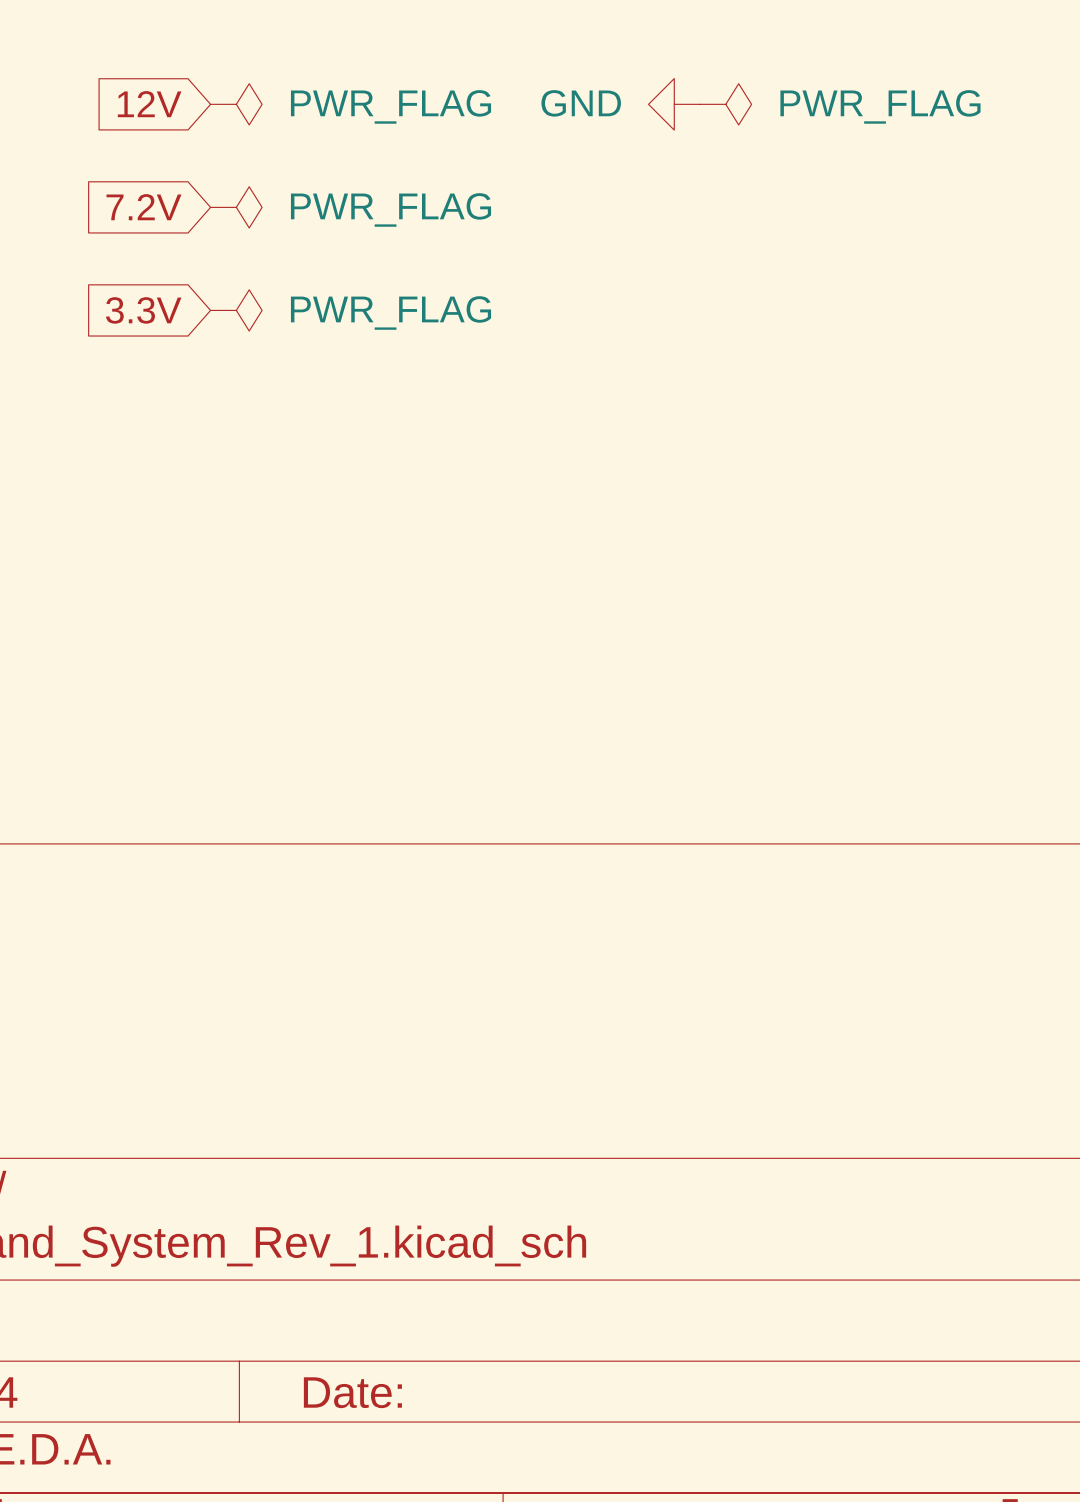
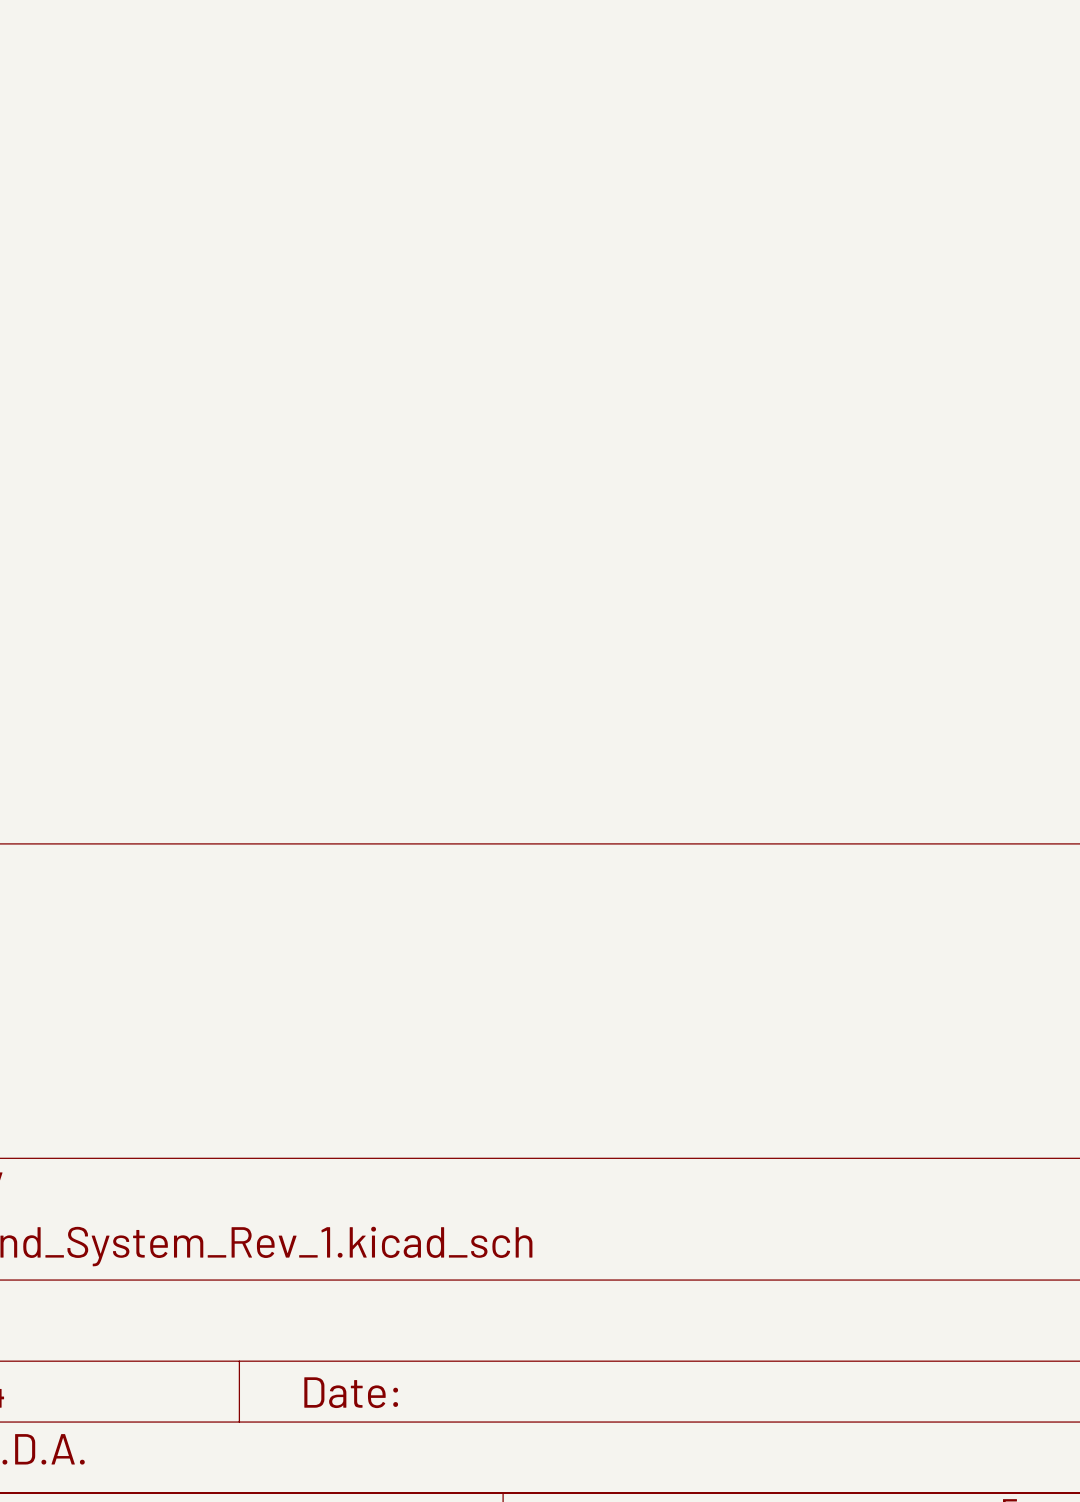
global label: 12V (149, 104) -> none
power symbol: PWR_FLAG (236, 104) -> none
power symbol: GND (674, 104) -> none
power symbol: PWR_FLAG (725, 104) -> none
global label: 7.2V (143, 207) -> none
power symbol: PWR_FLAG (236, 207) -> none
global label: 3.3V (143, 310) -> none
power symbol: PWR_FLAG (236, 310) -> none

